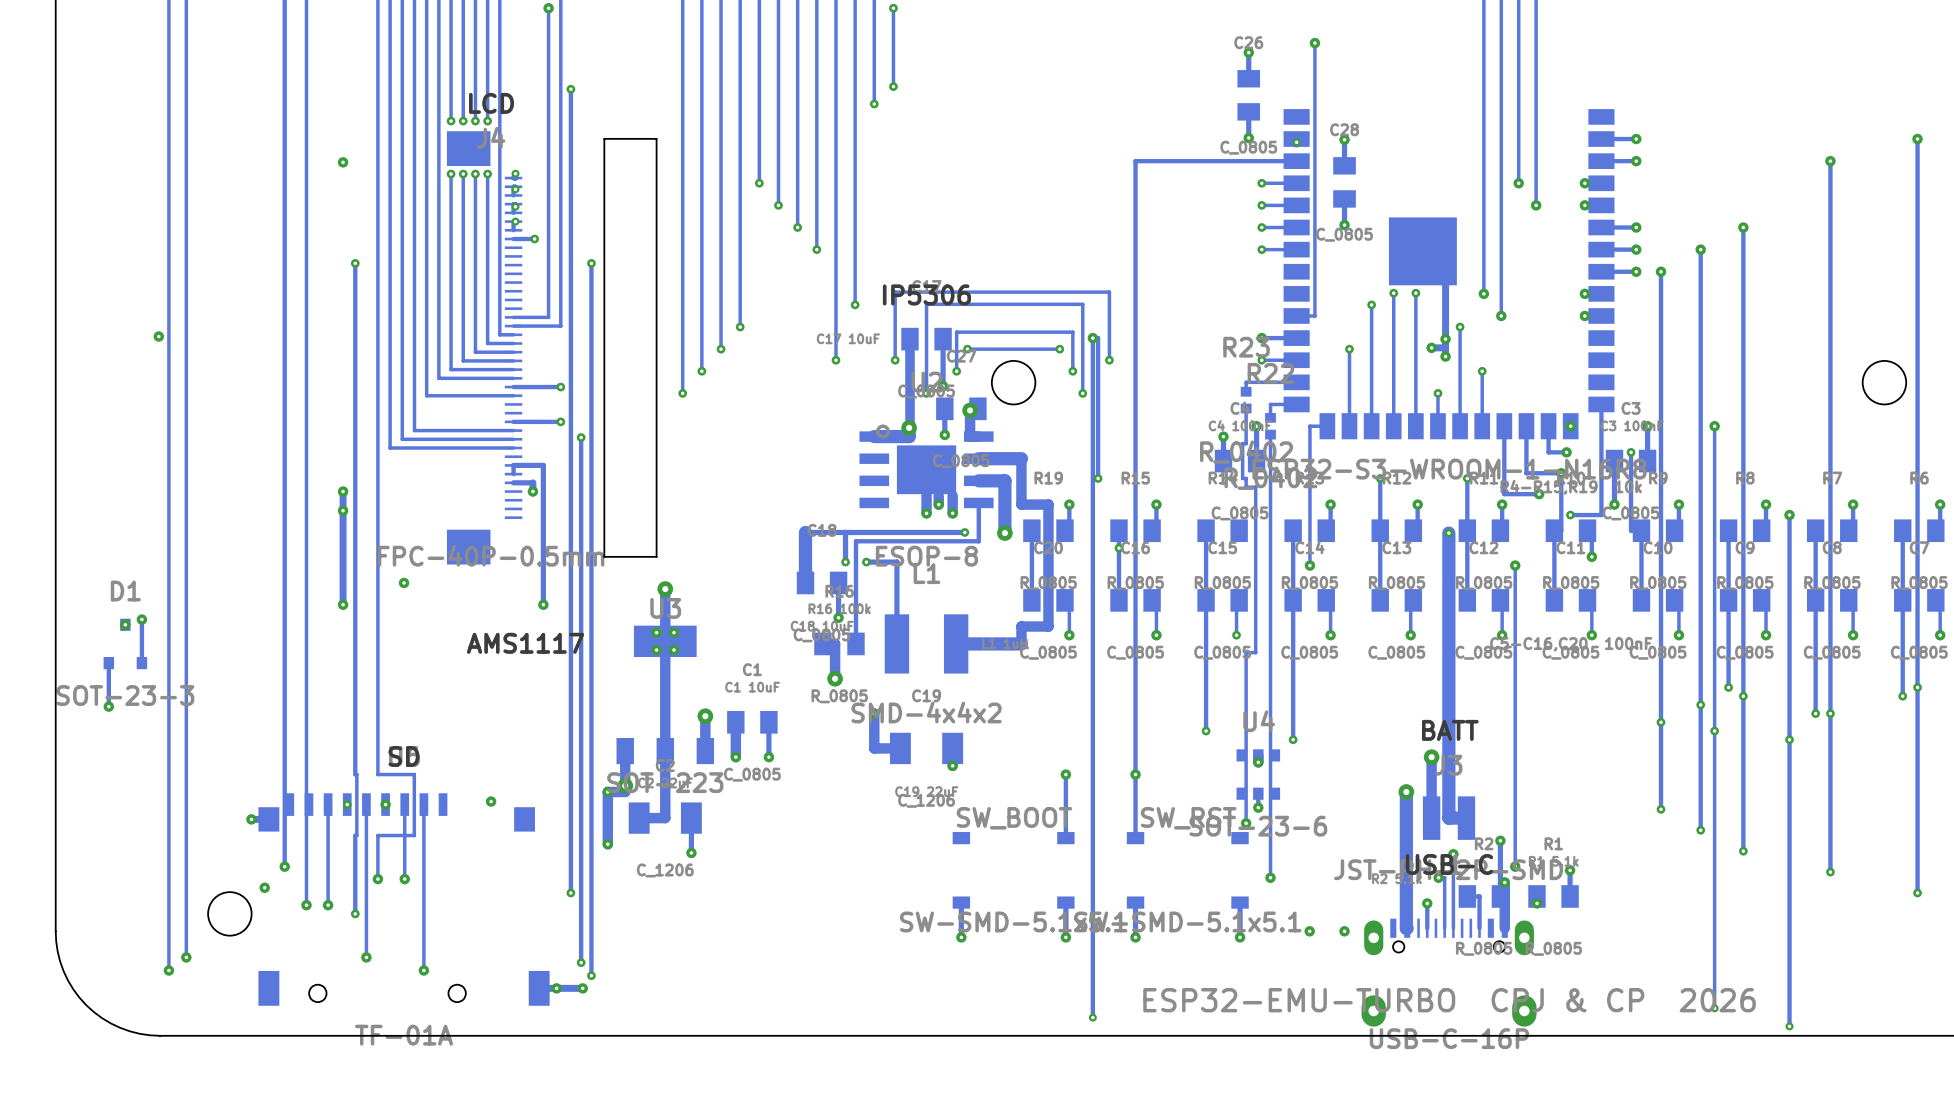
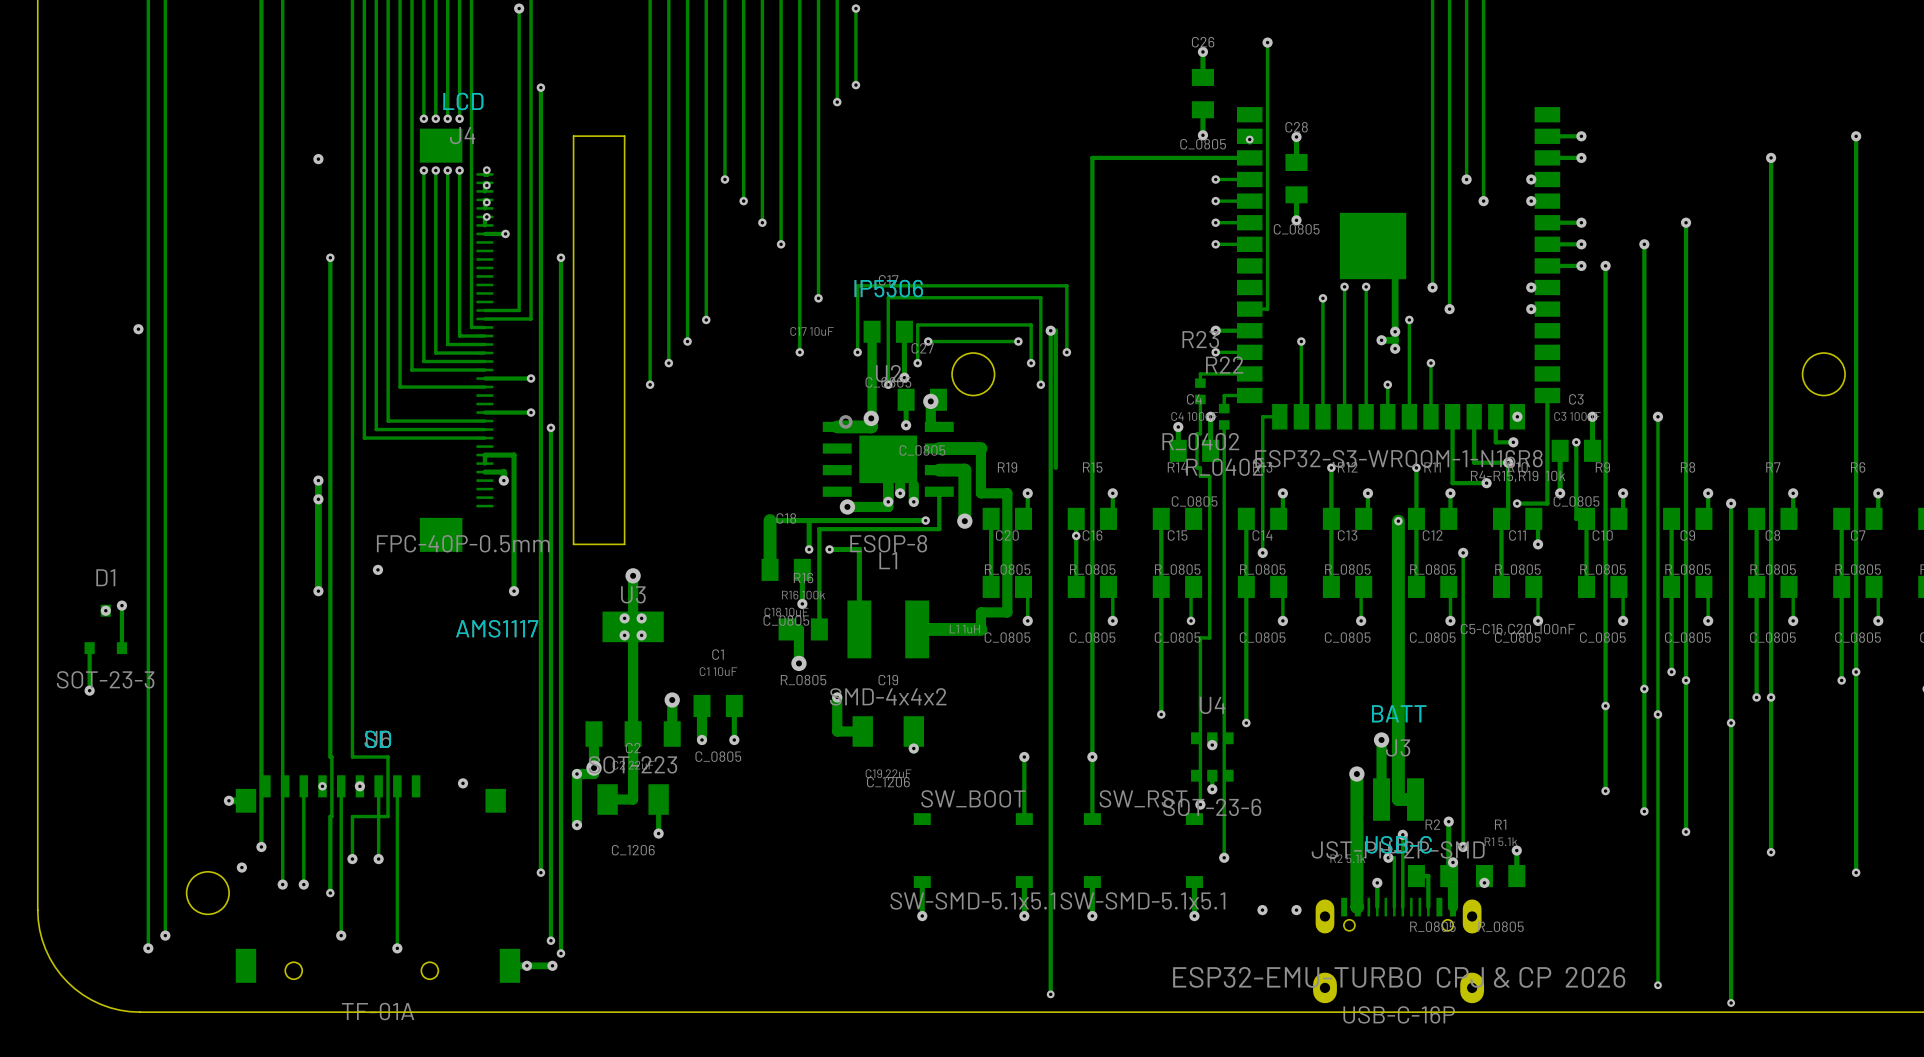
via: (1098, 478) -> none
track: none -> (888, 501) (888, 506) (847, 506)
via: none -> (847, 506)

